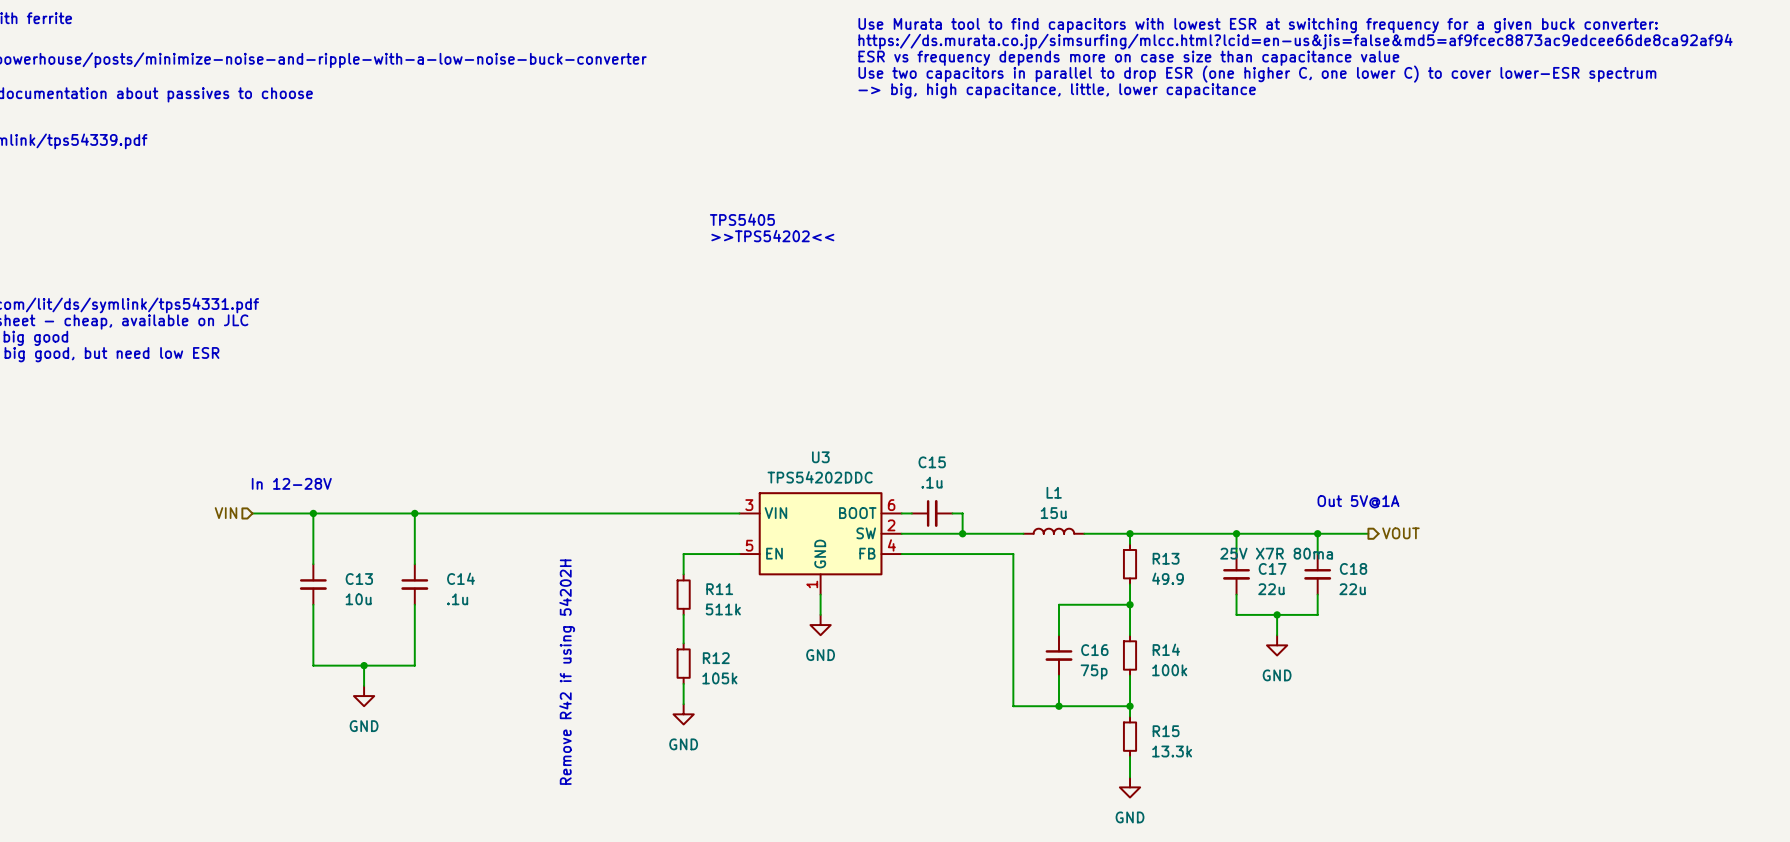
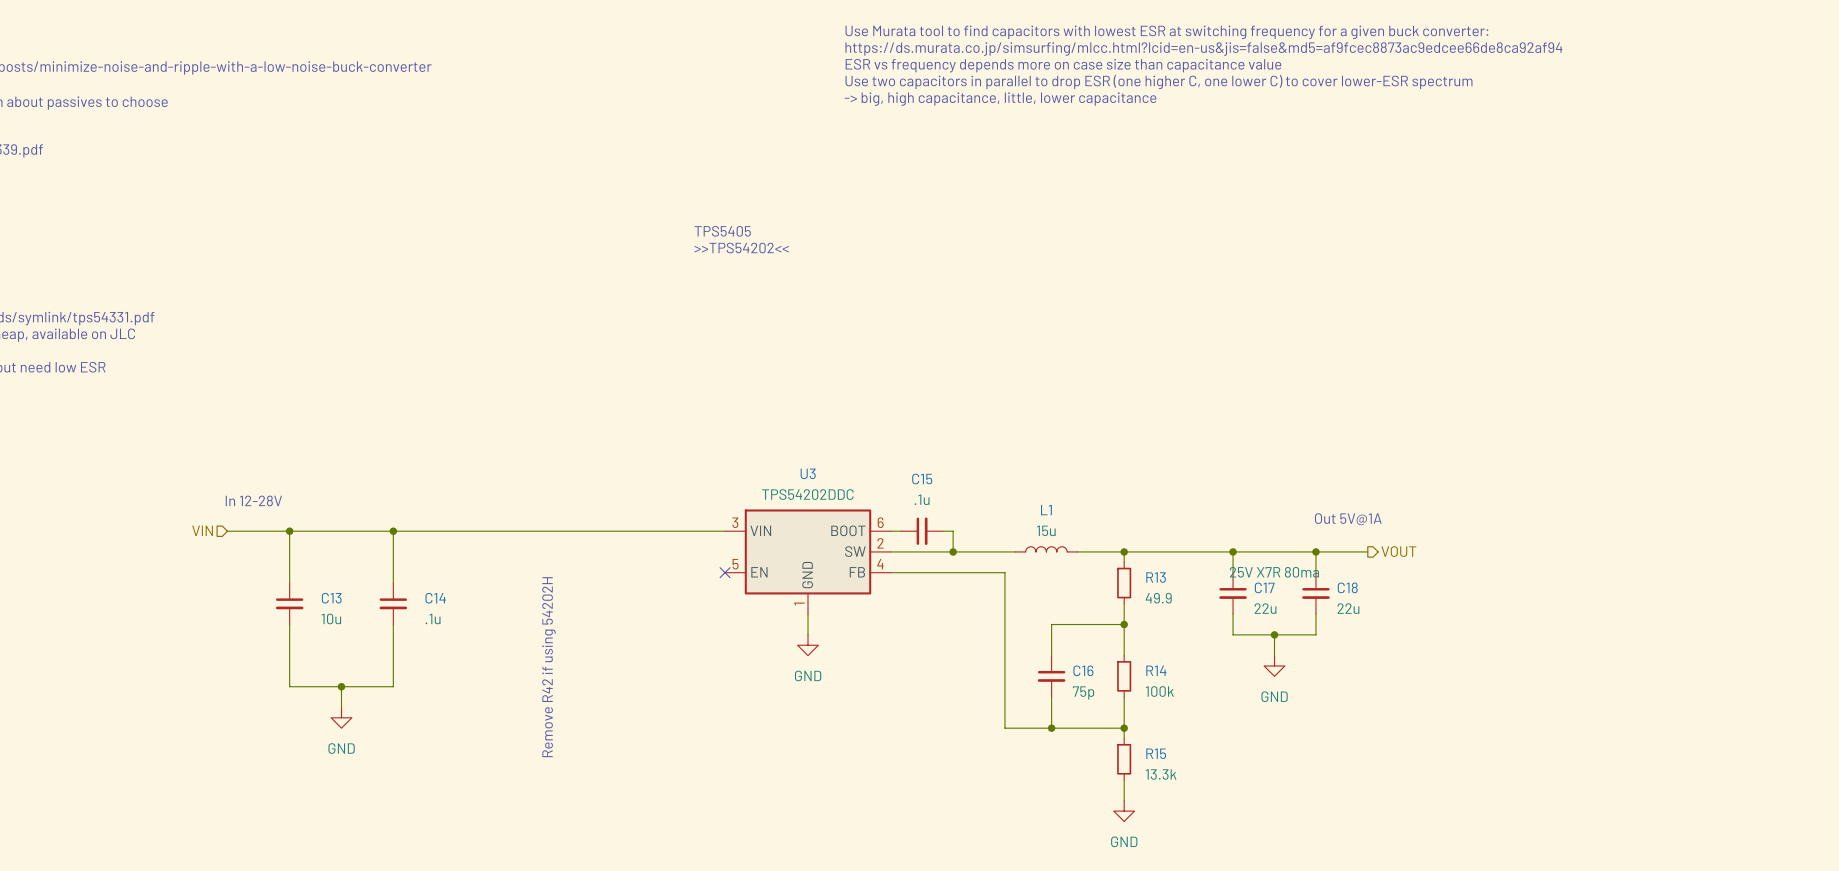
wire: (739, 554) (683, 554) (683, 574) -> none
no-connect mark: none -> (725, 572)
R11: 511k (683, 594) -> none
wire: (683, 614) (683, 643) -> none
R12: 105k (683, 663) -> none
wire: (683, 683) (683, 704) -> none
power symbol: GND (683, 714) -> none

